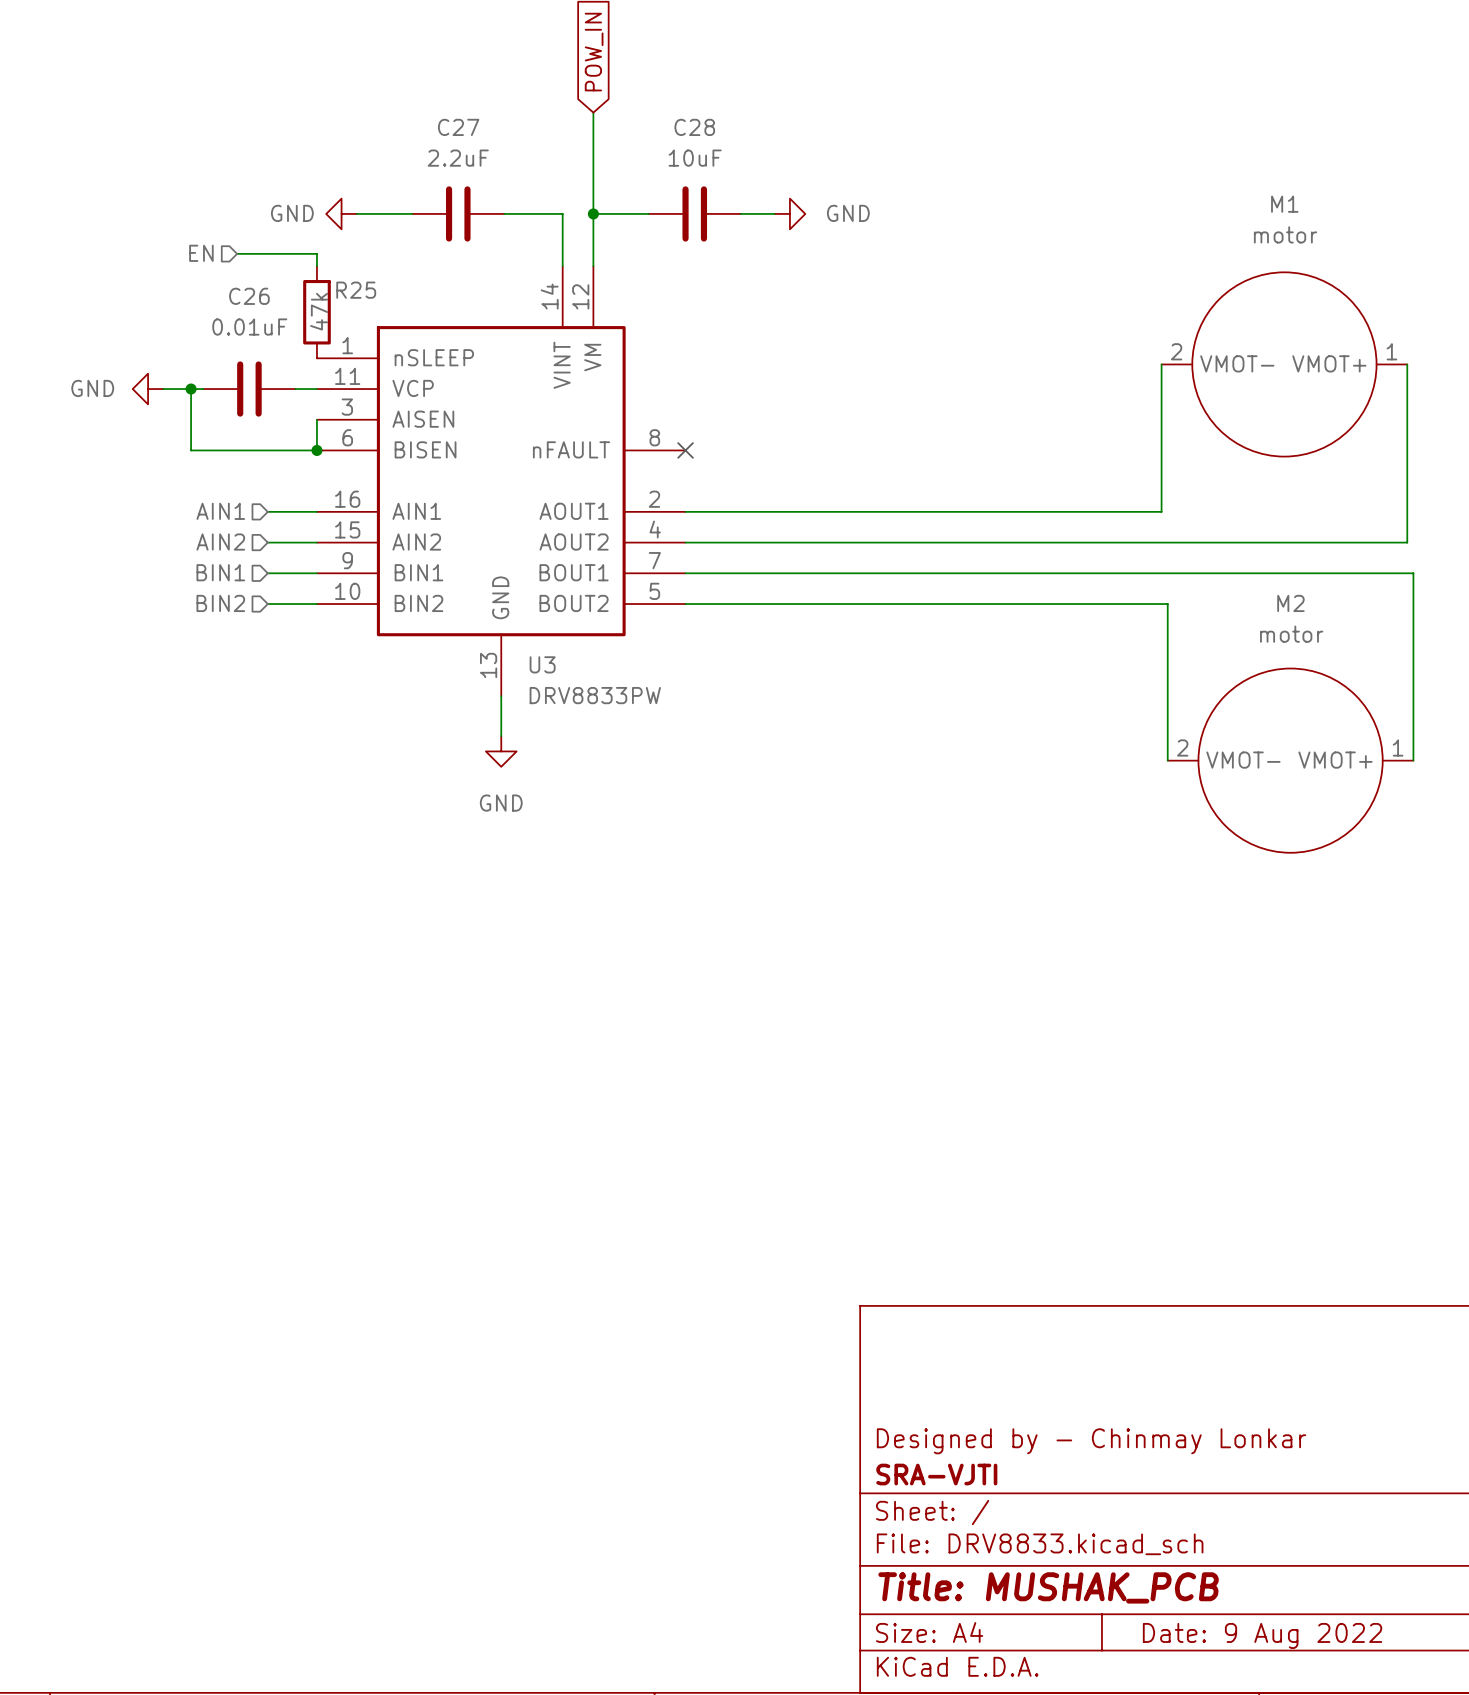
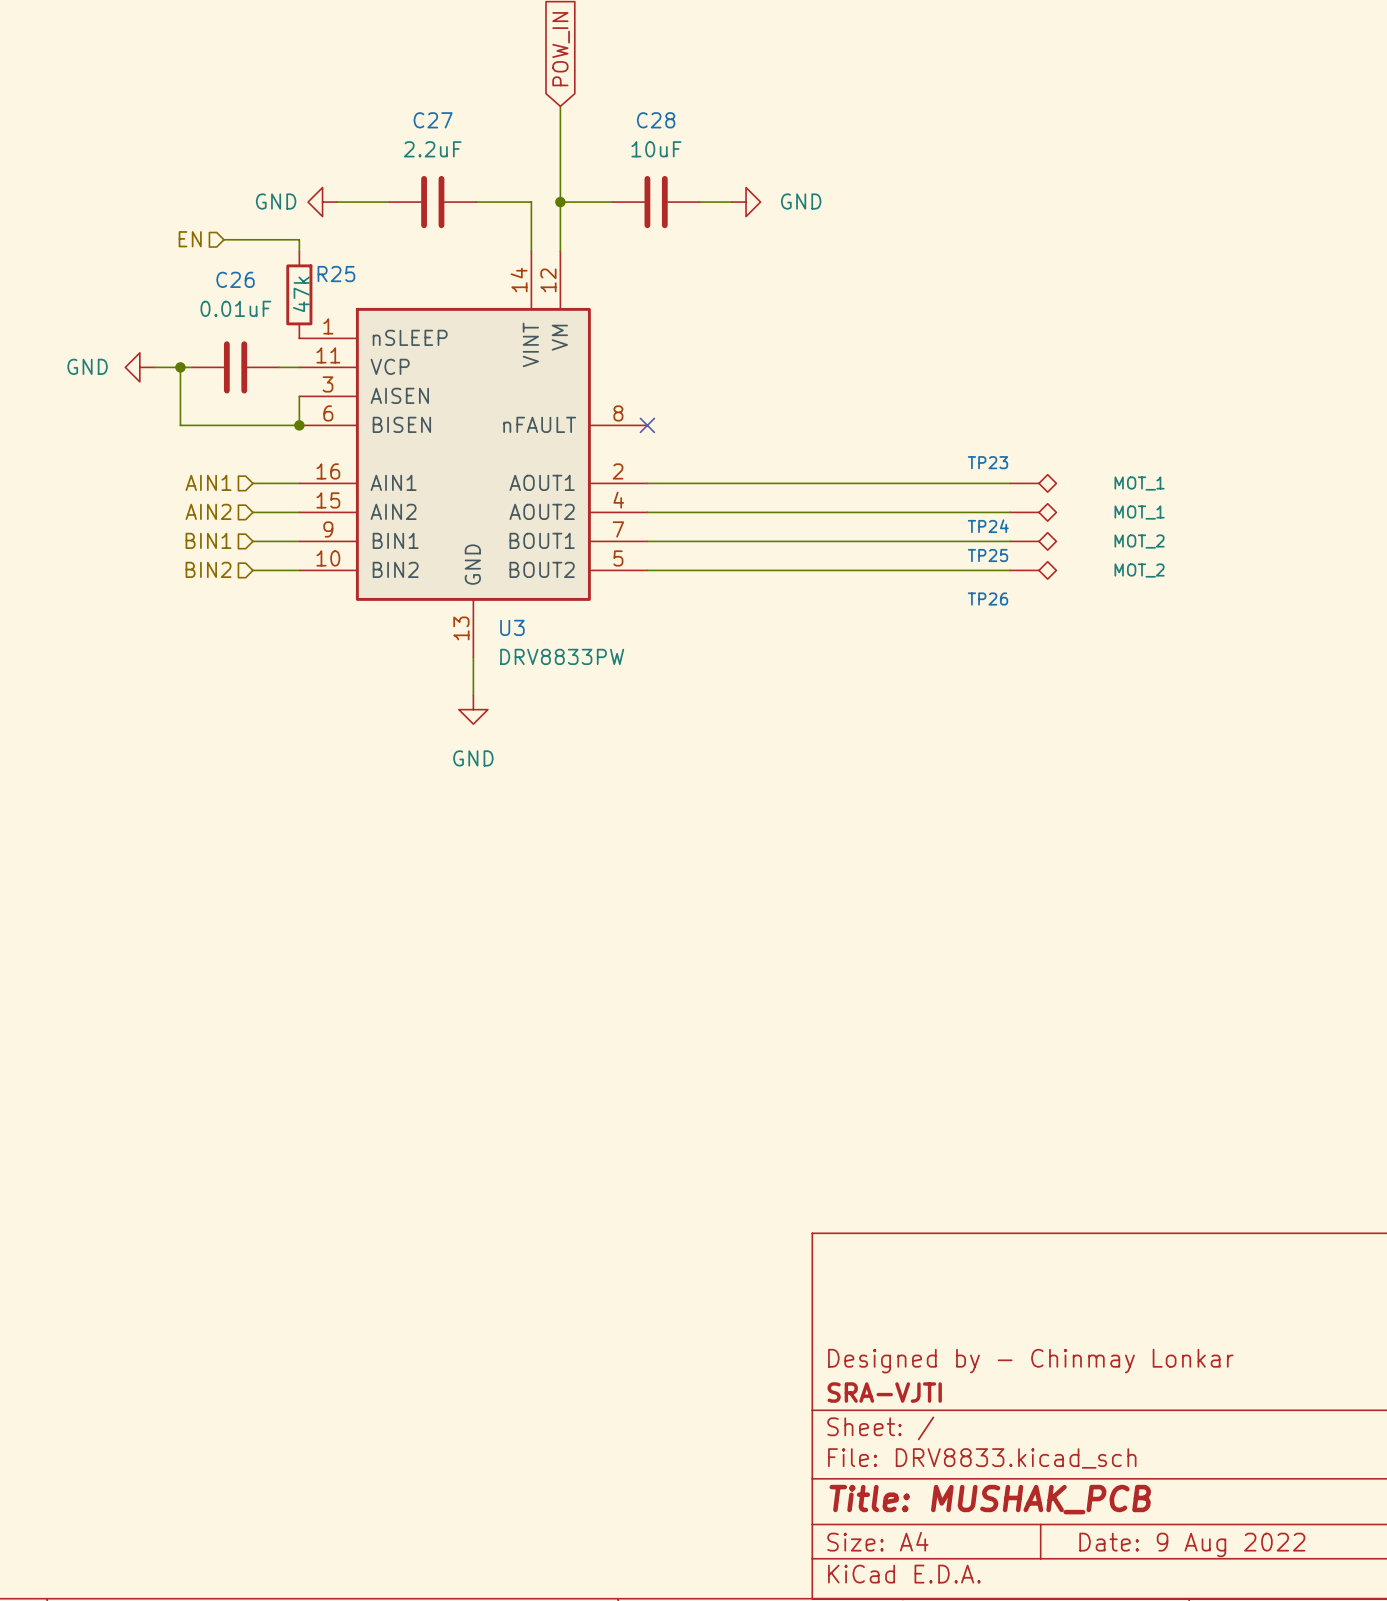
wire: (1161, 364) (1161, 511) (1069, 511) -> none
M1: motor (1284, 364) -> none
wire: (1407, 364) (1407, 542) (1069, 542) -> none
TP23: none -> MOT_1 (1033, 483)
TP24: none -> MOT_1 (1033, 512)
wire: (1069, 573) (1413, 573) (1413, 760) -> none
TP25: none -> MOT_2 (1033, 541)
wire: (1069, 604) (1167, 604) (1167, 760) -> none
TP26: none -> MOT_2 (1033, 570)
M2: motor (1290, 760) -> none

